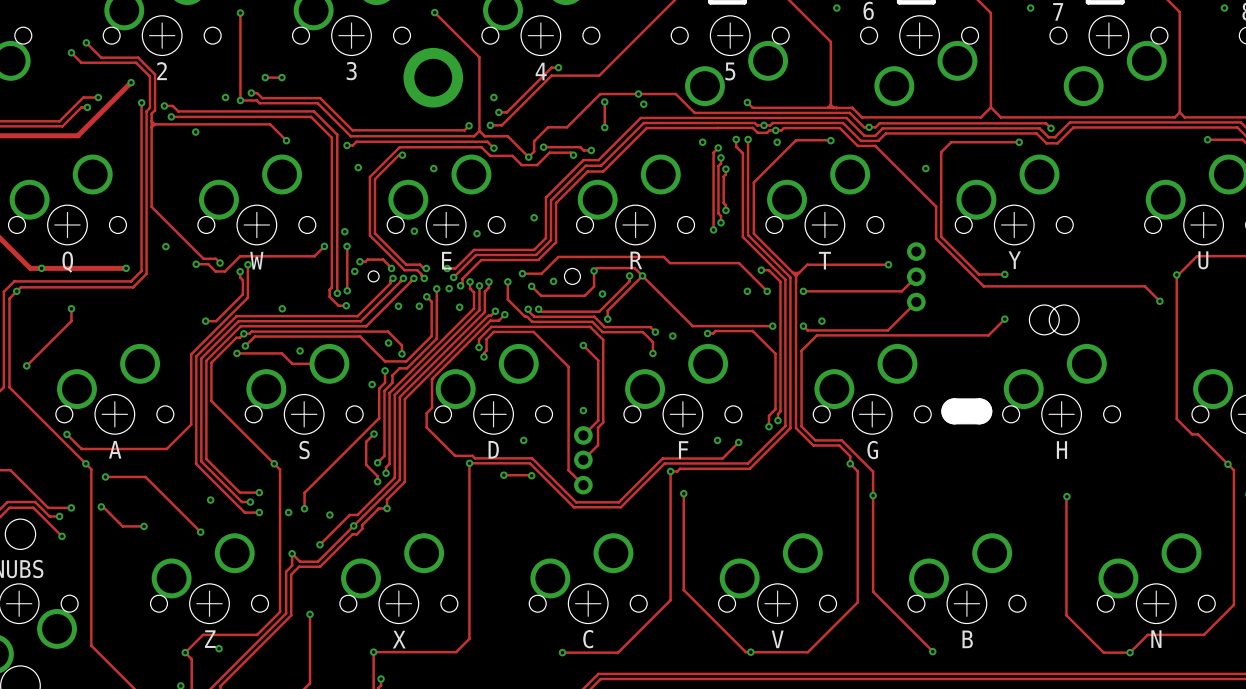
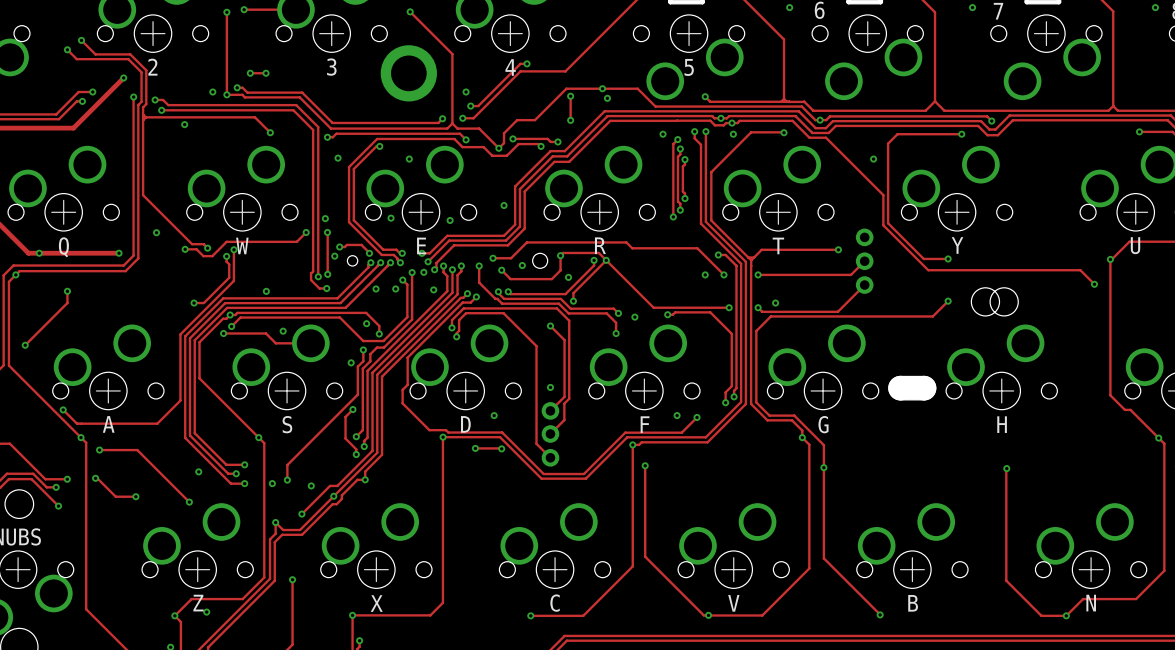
track: none -> (244, 9) (295, 9)
via: none -> (244, 9)

